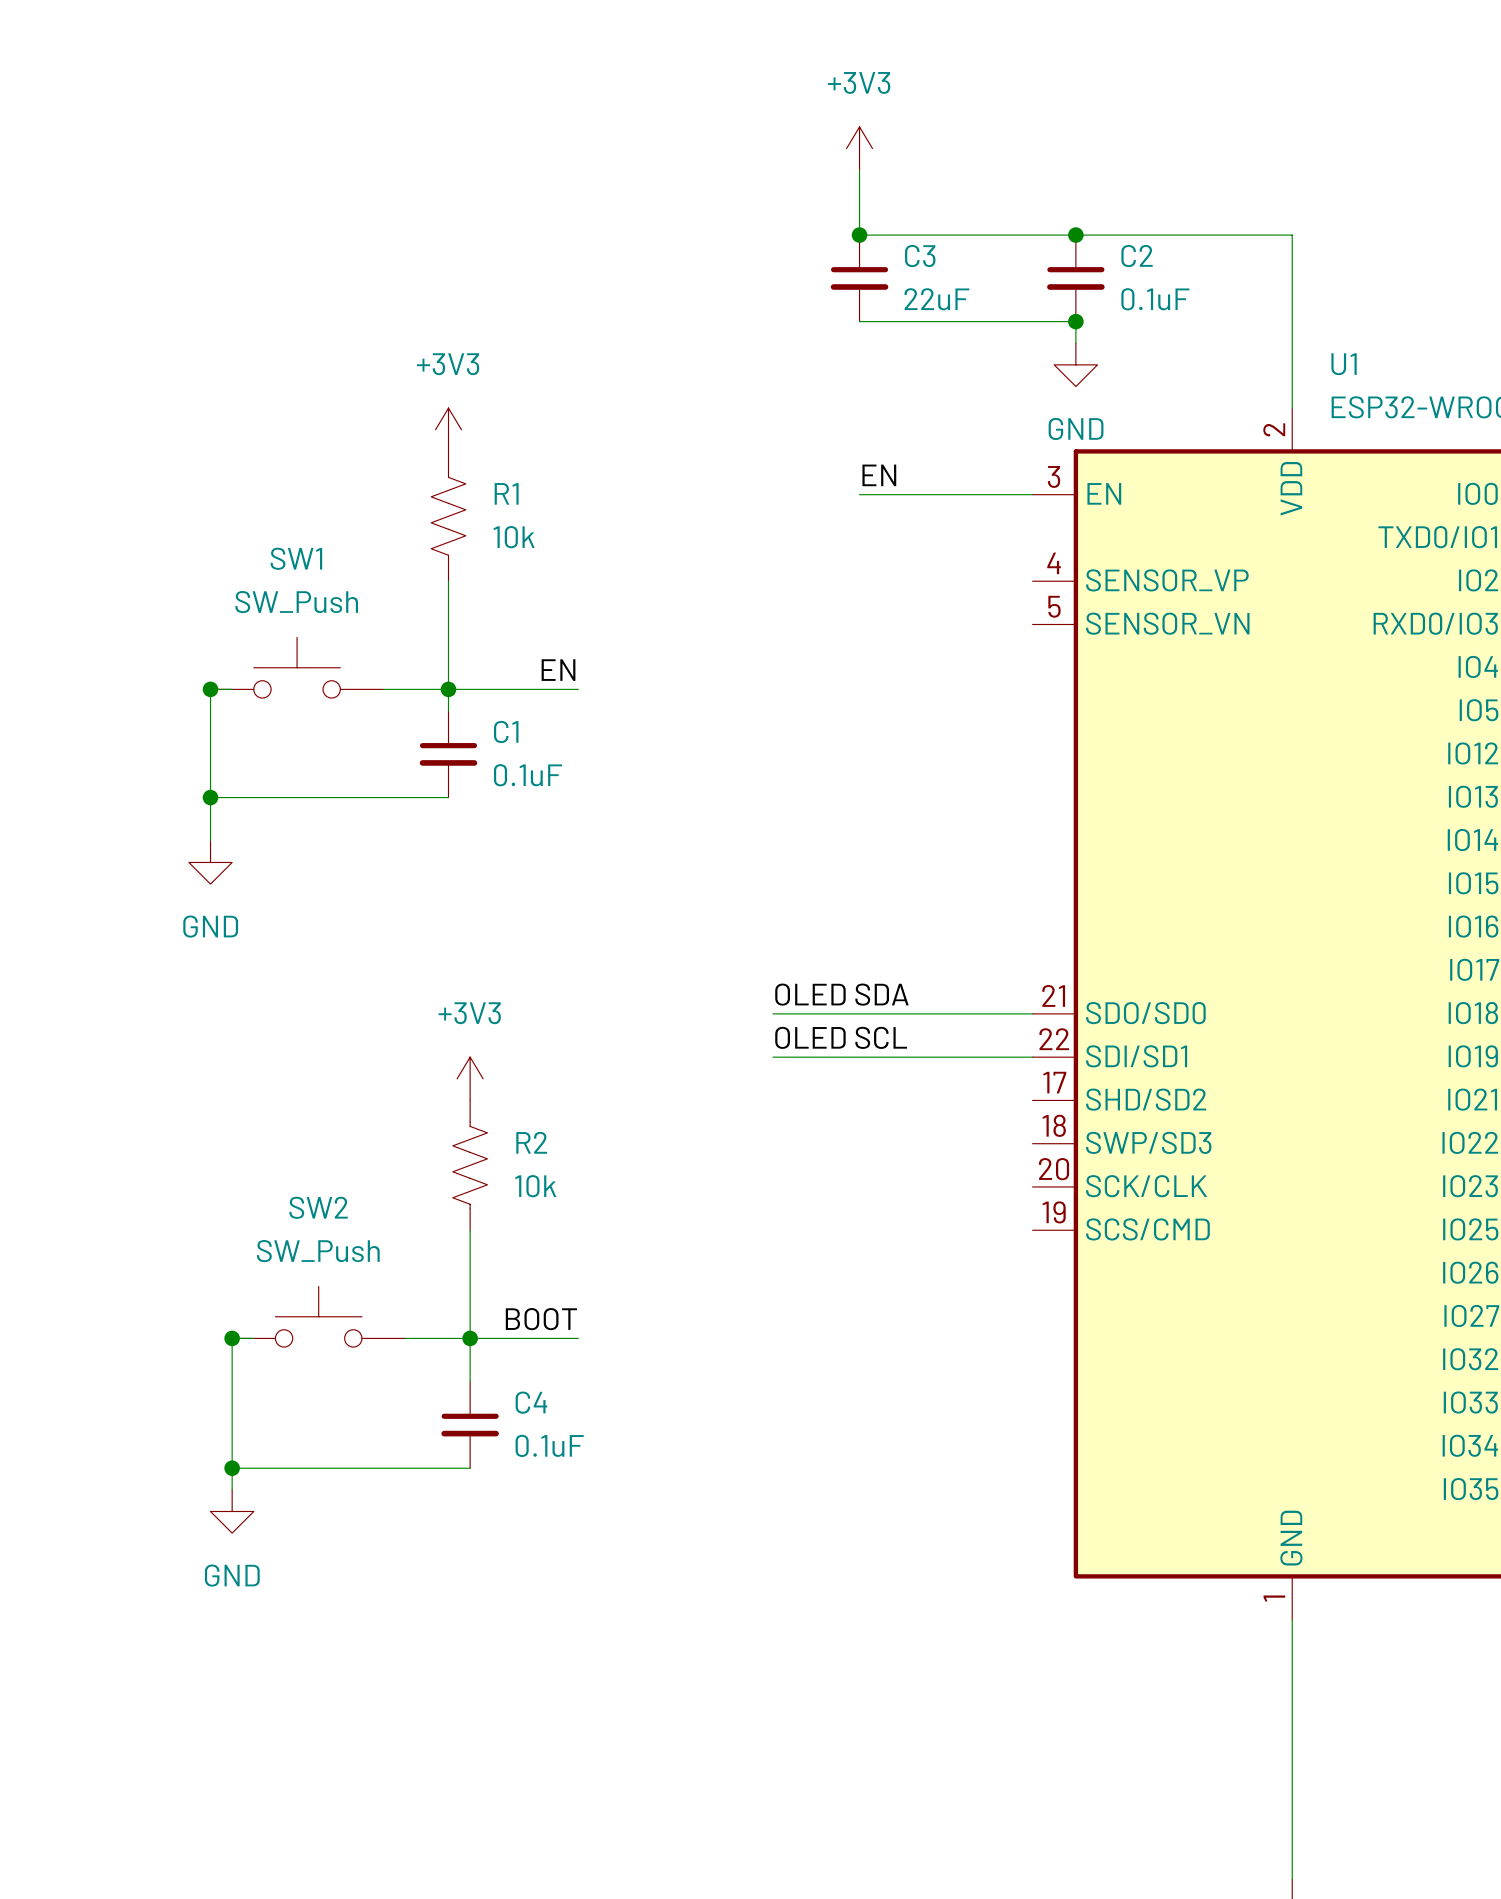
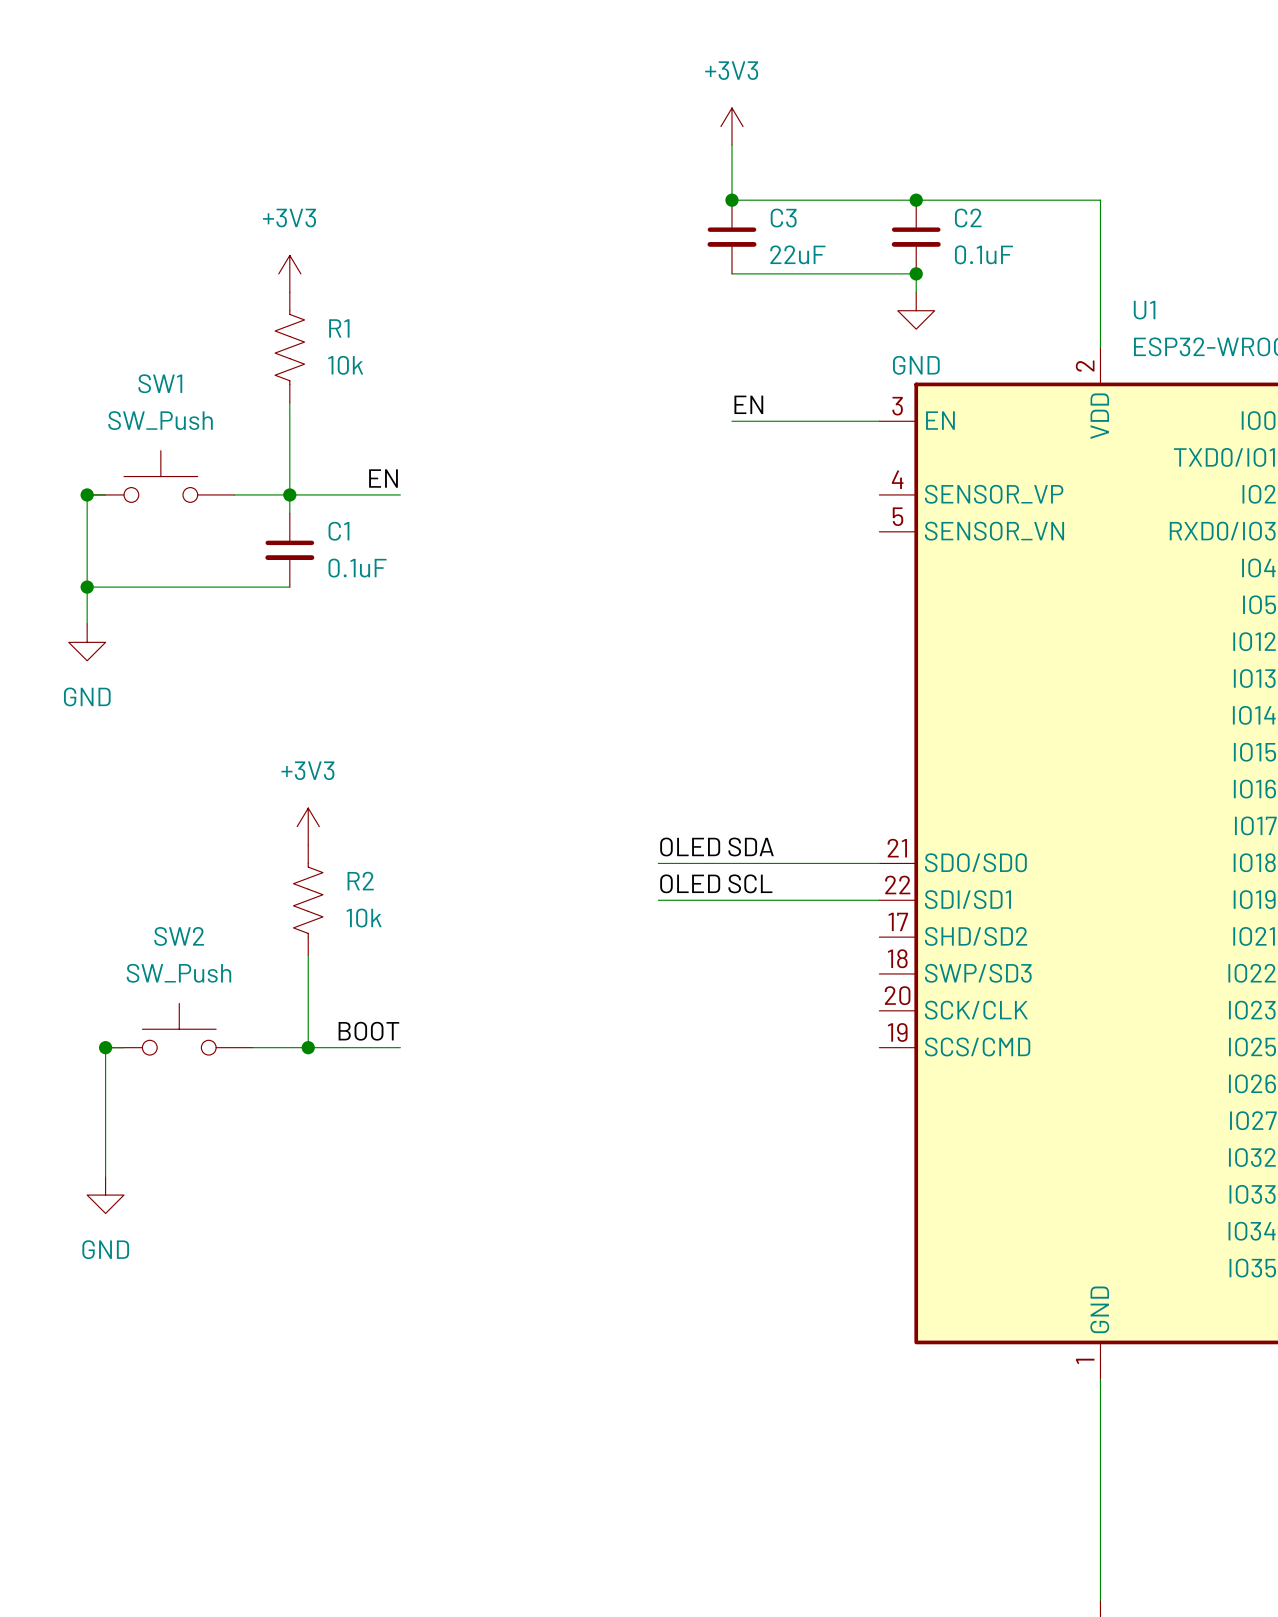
power symbol position: +3V3 (448, 429) -> +3V3 (289, 273)
R1 position: (448, 516) -> (289, 347)
junction: none -> (87, 494)
wire: none -> (105, 494) (87, 494) (87, 623)
junction: none -> (289, 494)
wire: (448, 581) (448, 711) -> (289, 402) (289, 513)
SW1 position: (297, 667) -> (160, 476)
label position: EN (558, 670) -> EN (383, 478)
junction: none -> (87, 587)
wire: (210, 689) (210, 840) -> (179, 587) (87, 587)
junction: (210, 689) -> none
wire: none -> (197, 587) (289, 587)
wire: (383, 689) (578, 689) -> (234, 494) (400, 494)
junction: (448, 689) -> none
C1 position: (448, 754) -> (289, 550)
wire: (210, 797) (448, 797) -> none
junction: (210, 797) -> none
power symbol position: GND (210, 862) -> GND (87, 642)
power symbol position: +3V3 (470, 1078) -> +3V3 (308, 826)
wire: none -> (308, 955) (308, 1047)
R2 position: (470, 1165) -> (308, 900)
junction: none -> (105, 1047)
junction: none -> (308, 1047)
wire: (470, 1230) (470, 1381) -> (400, 1047) (252, 1047)
SW2 position: (318, 1316) -> (179, 1029)
label position: BOOT (541, 1319) -> BOOT (368, 1031)
junction: (232, 1338) -> none
wire: (253, 1338) (232, 1338) (232, 1489) -> (124, 1047) (105, 1047) (105, 1176)
wire: (405, 1338) (578, 1338) -> none
junction: (470, 1338) -> none
C4: 0.1uF (470, 1424) -> none
wire: (232, 1468) (470, 1468) -> none
junction: (232, 1468) -> none
power symbol position: GND (232, 1511) -> GND (105, 1195)

